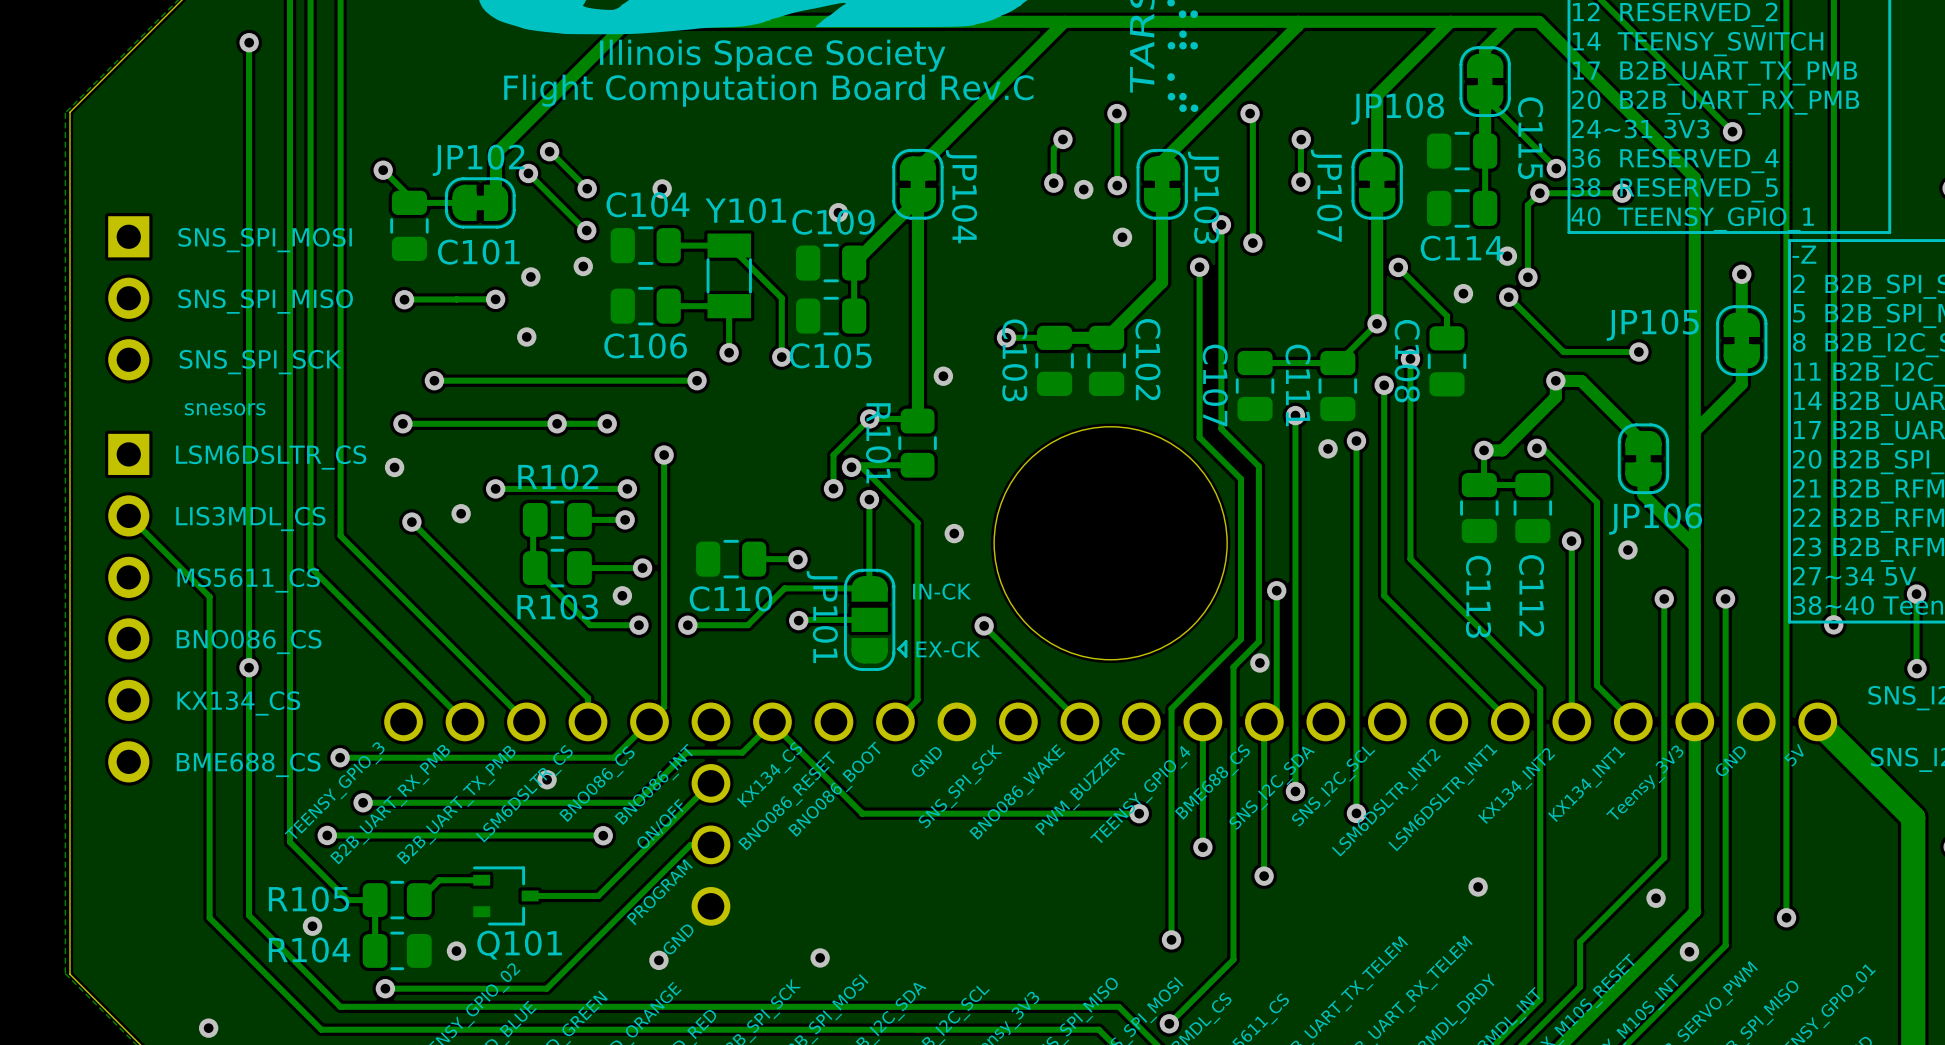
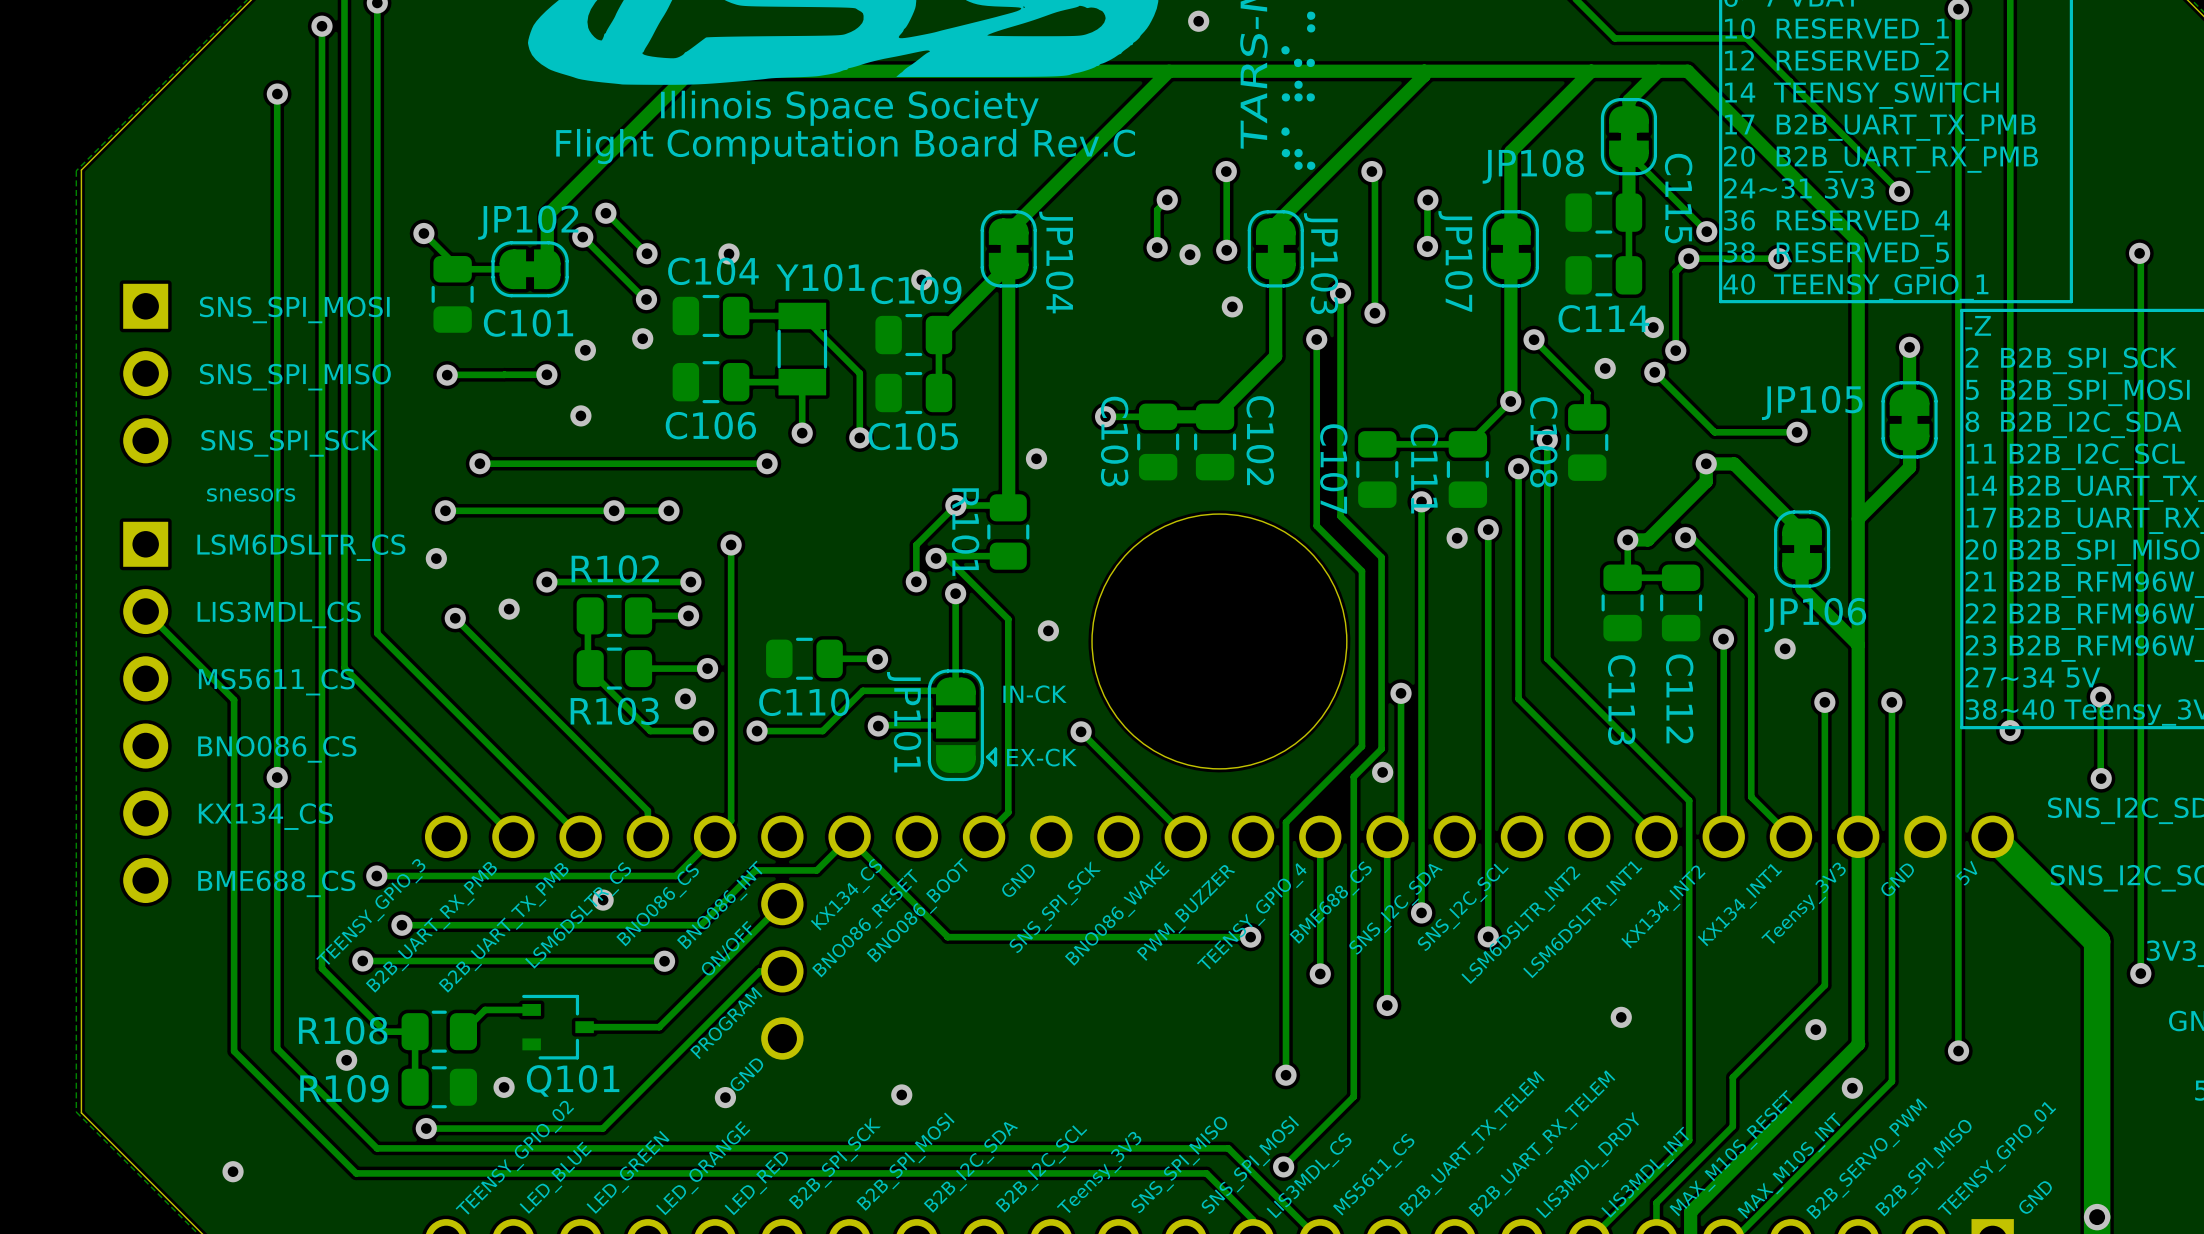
R105 name: R105 (309, 899) -> R109 (344, 1088)
R104 name: R104 (309, 950) -> R108 (343, 1030)

